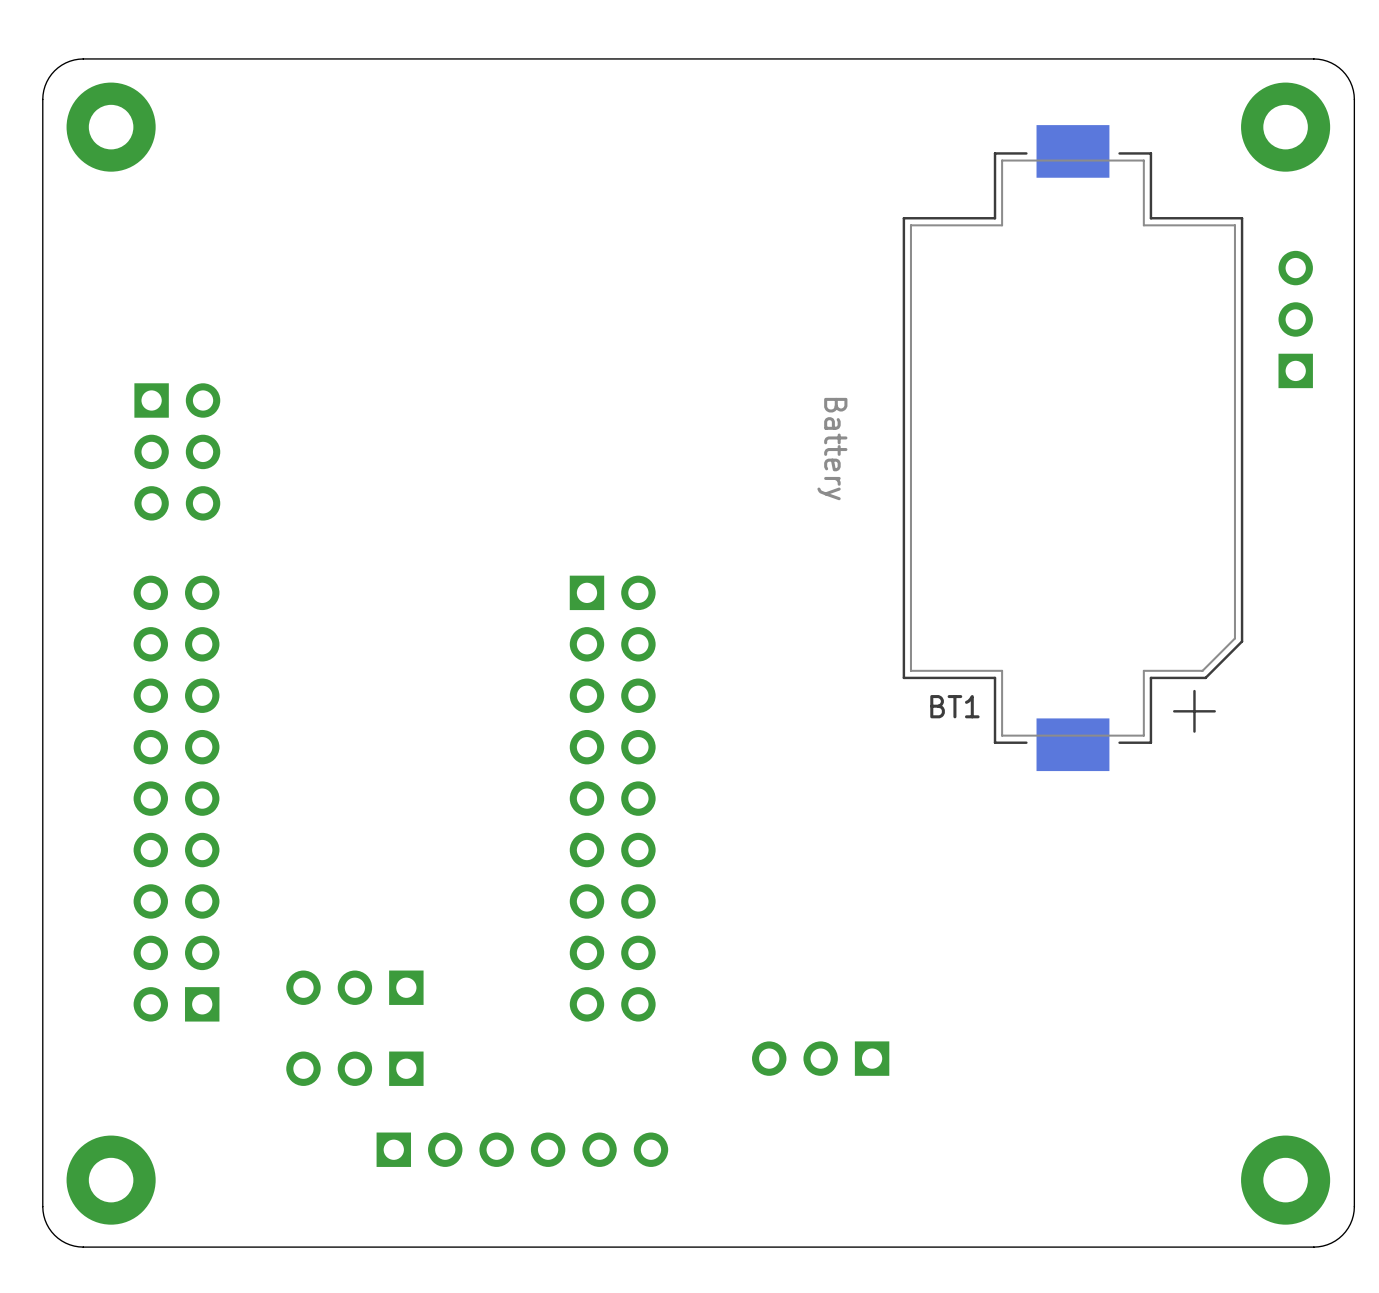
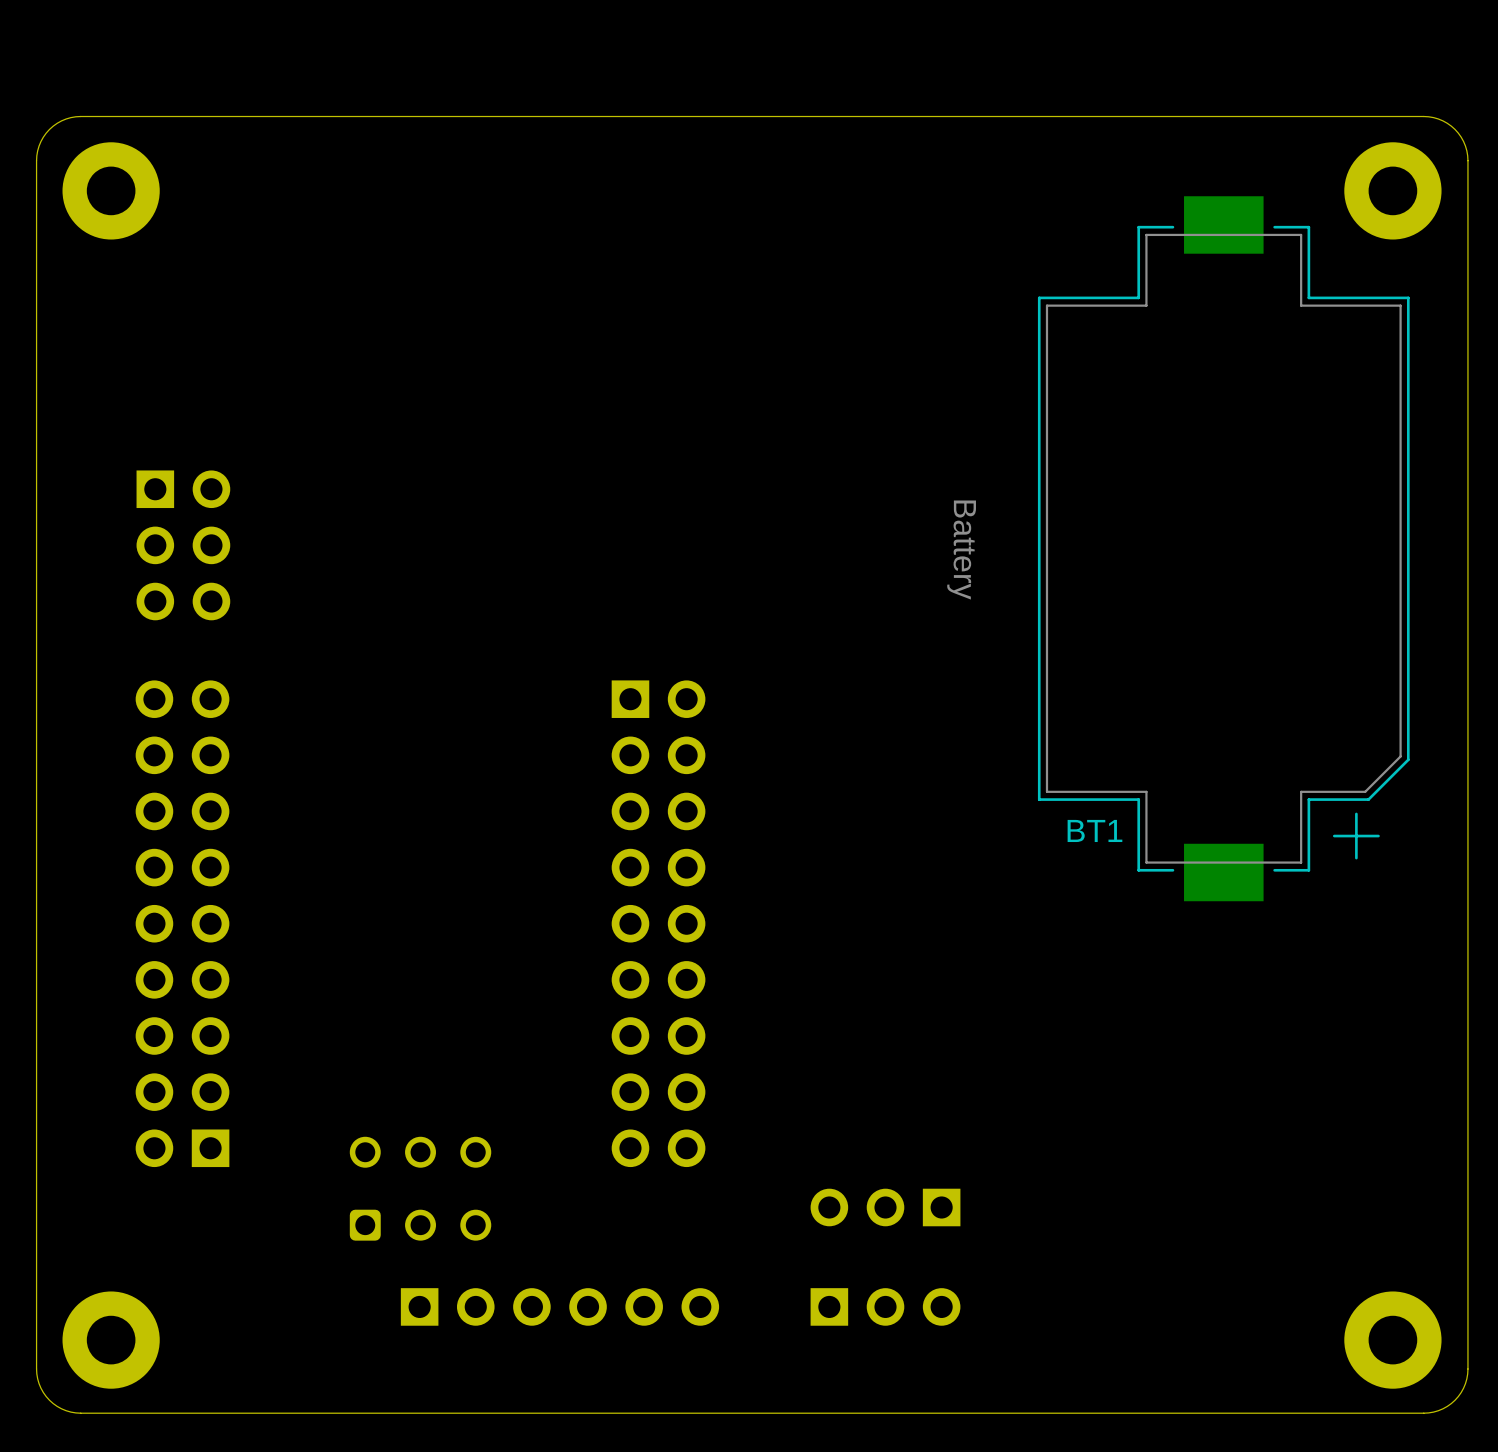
part: (1295, 319) -> none
BT1 position: (1072, 448) -> (1223, 548)
part: (354, 987) -> none
part: none -> (420, 1188)
part: (354, 1068) -> none
part: none -> (885, 1306)

